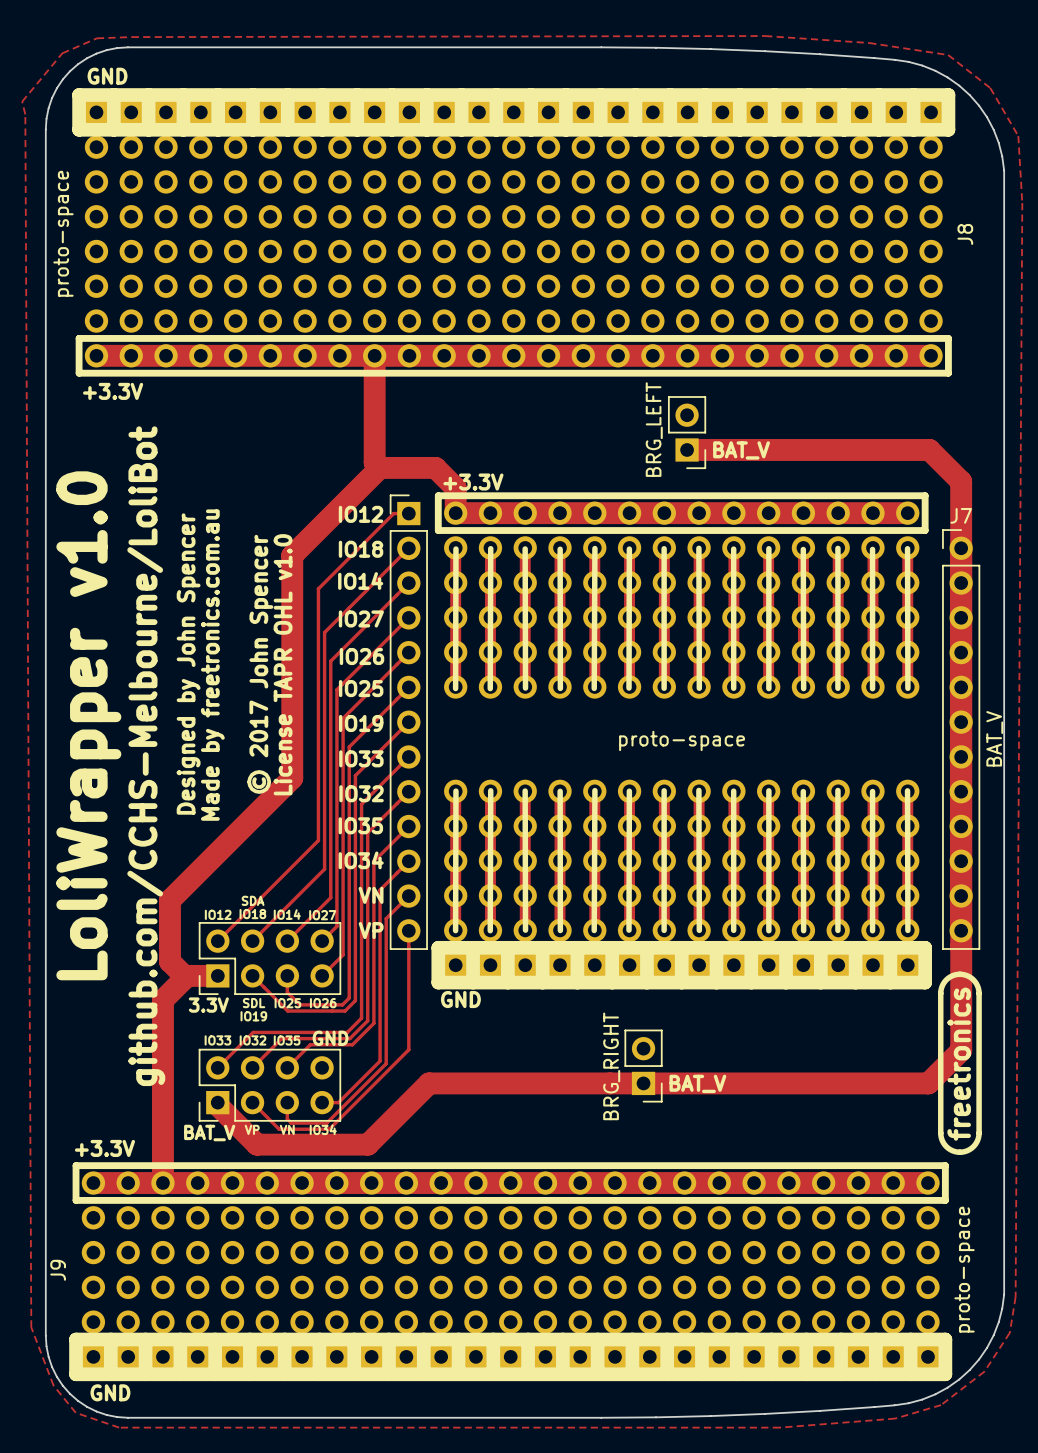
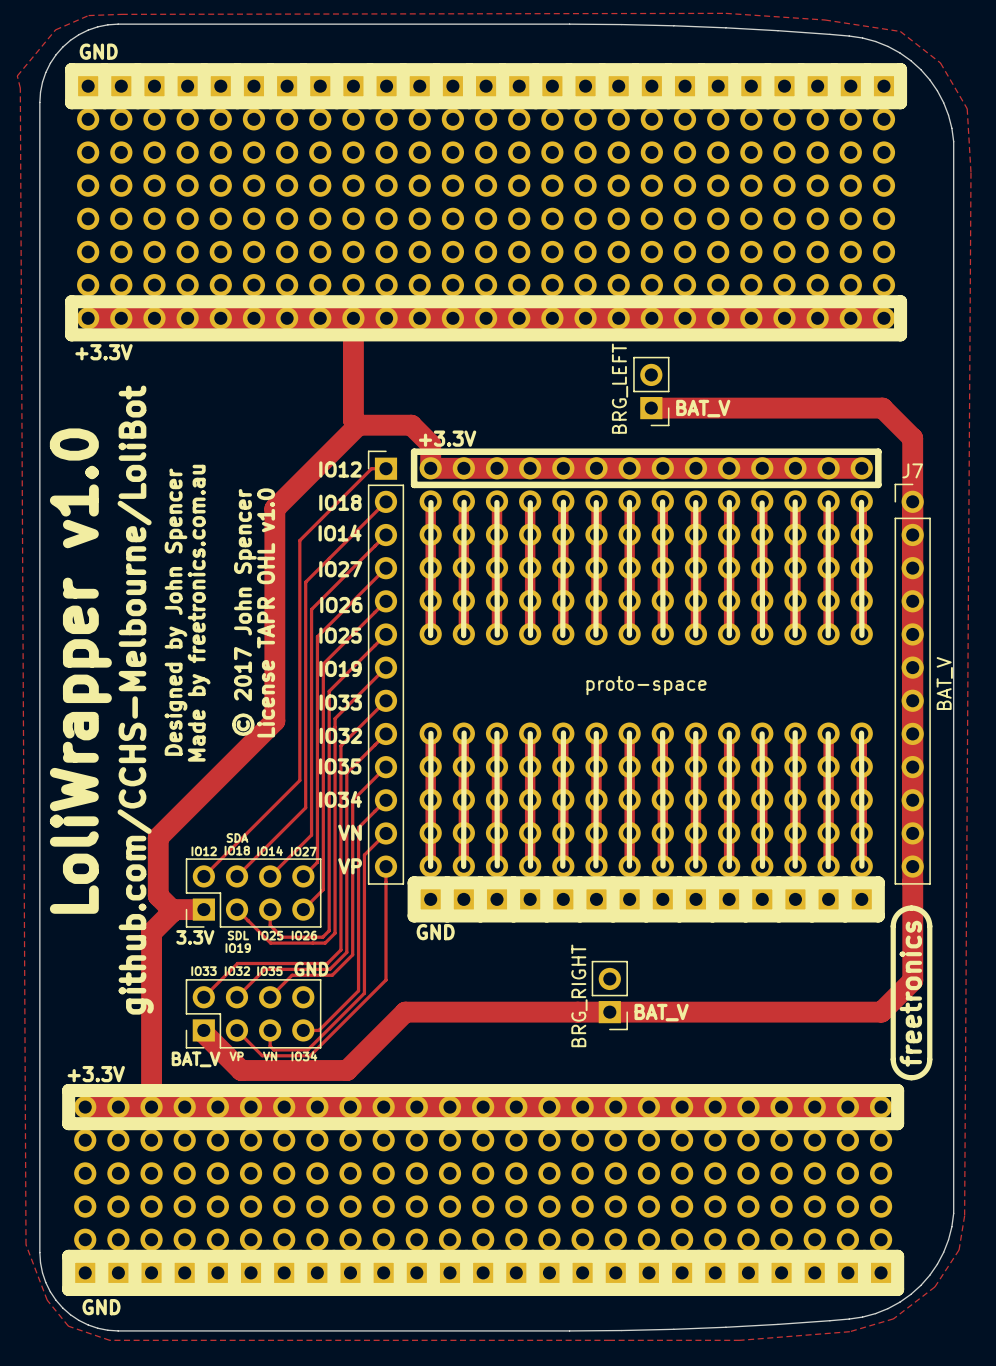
J8: proto-space (513, 232) -> none
part: none -> (486, 202)
part: none -> (483, 1189)
J9: proto-space (510, 1271) -> none

